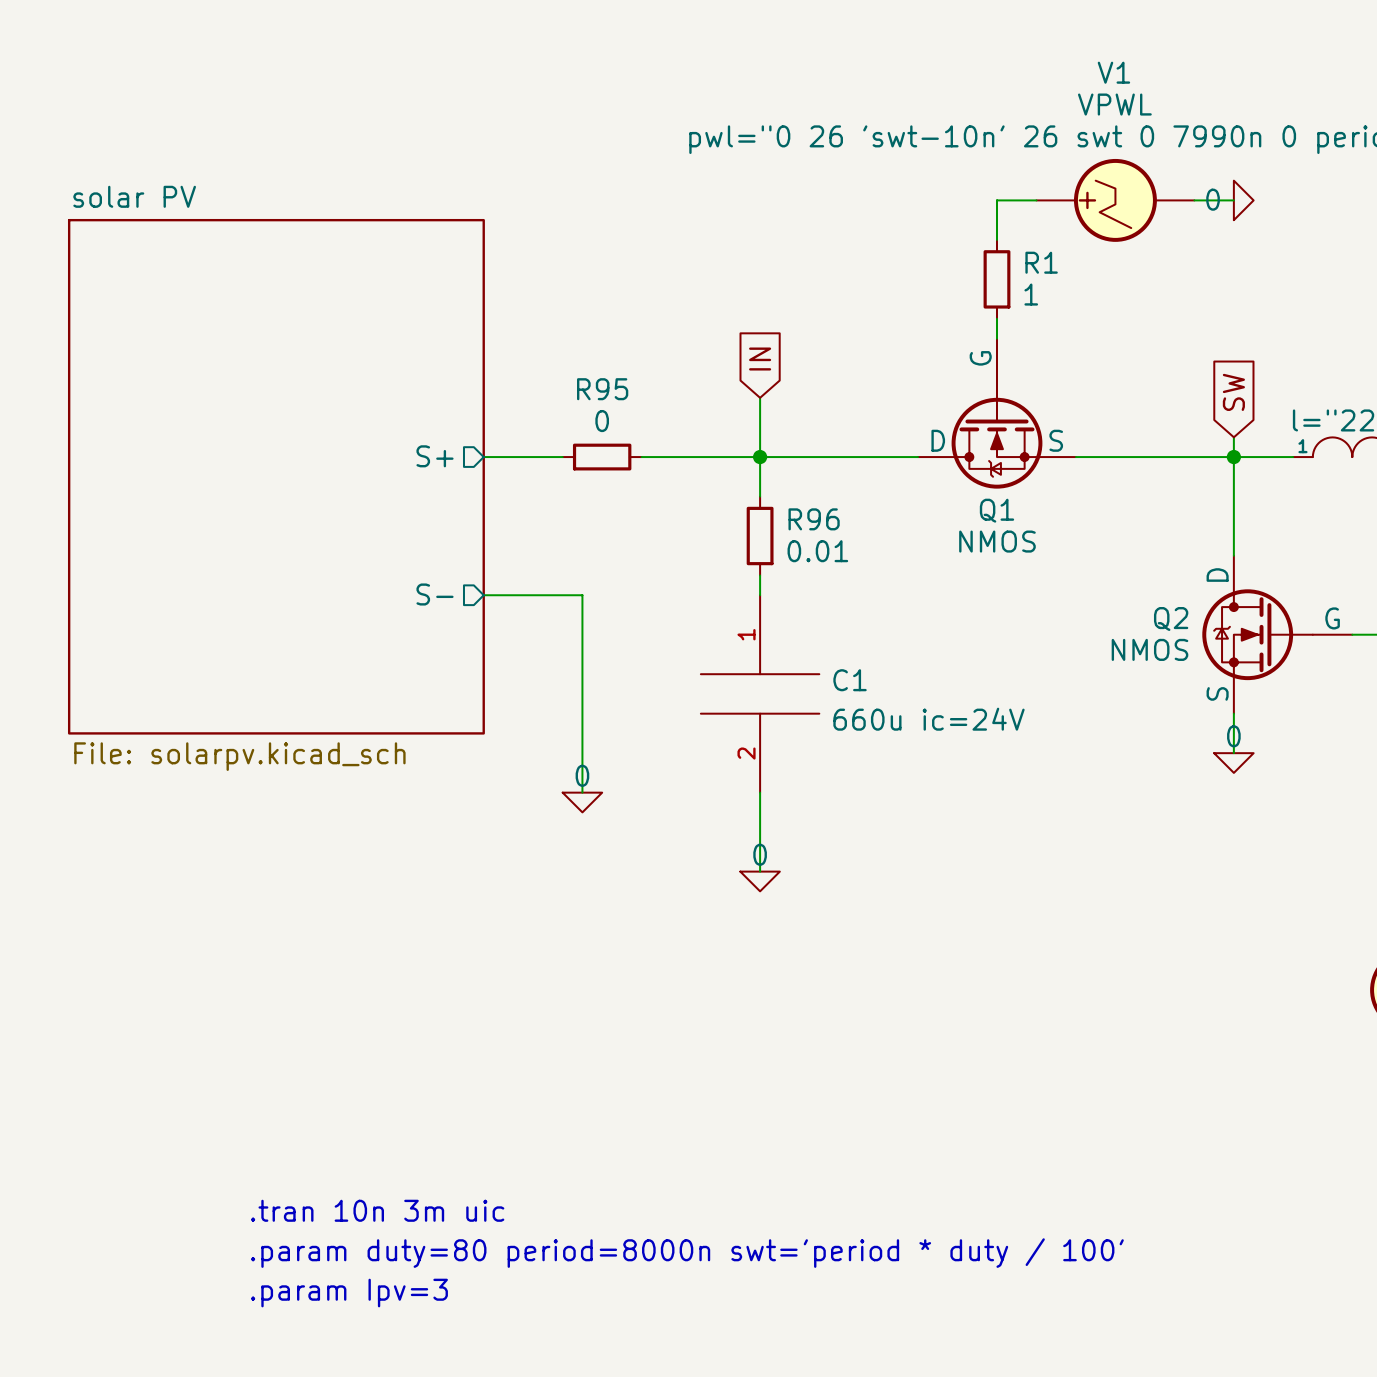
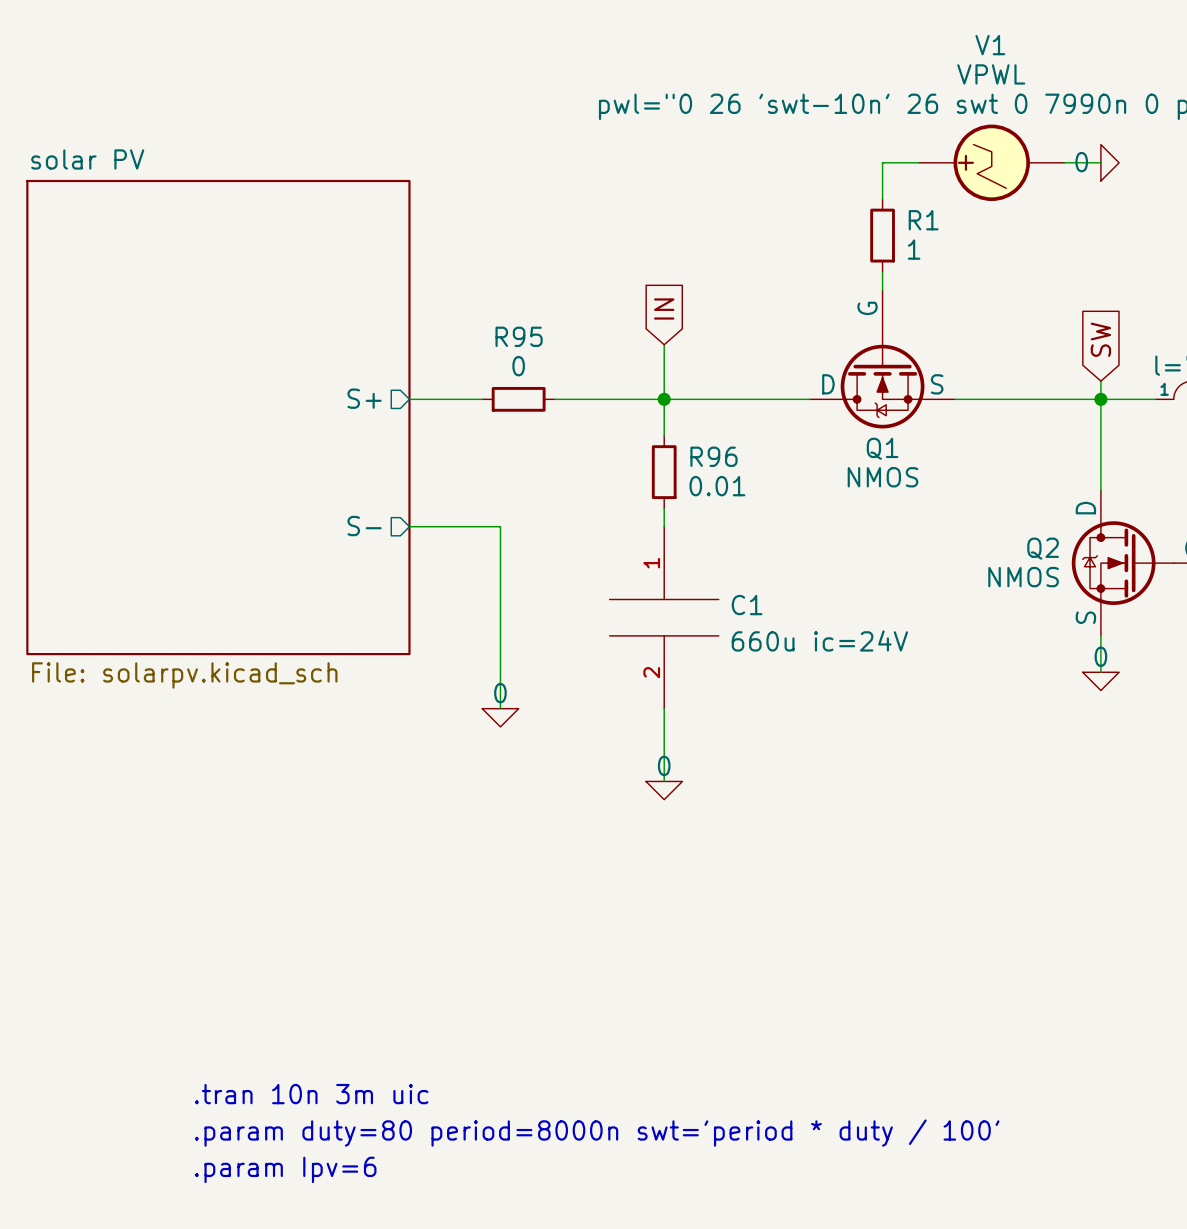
text: .param Ipv=3 (349, 1293) -> .param Ipv=6 (285, 1169)

